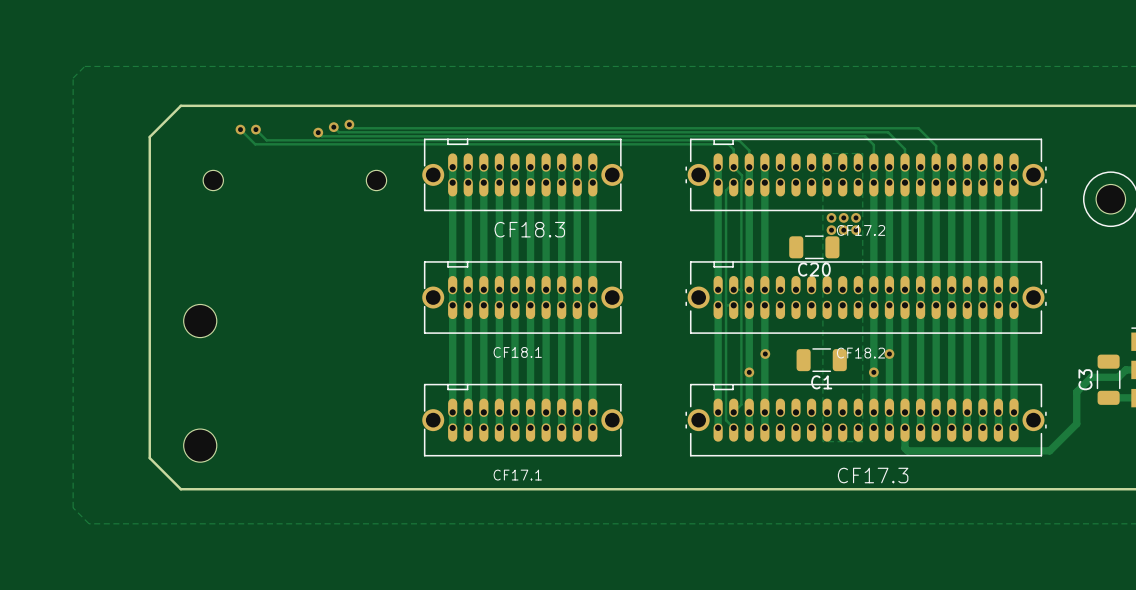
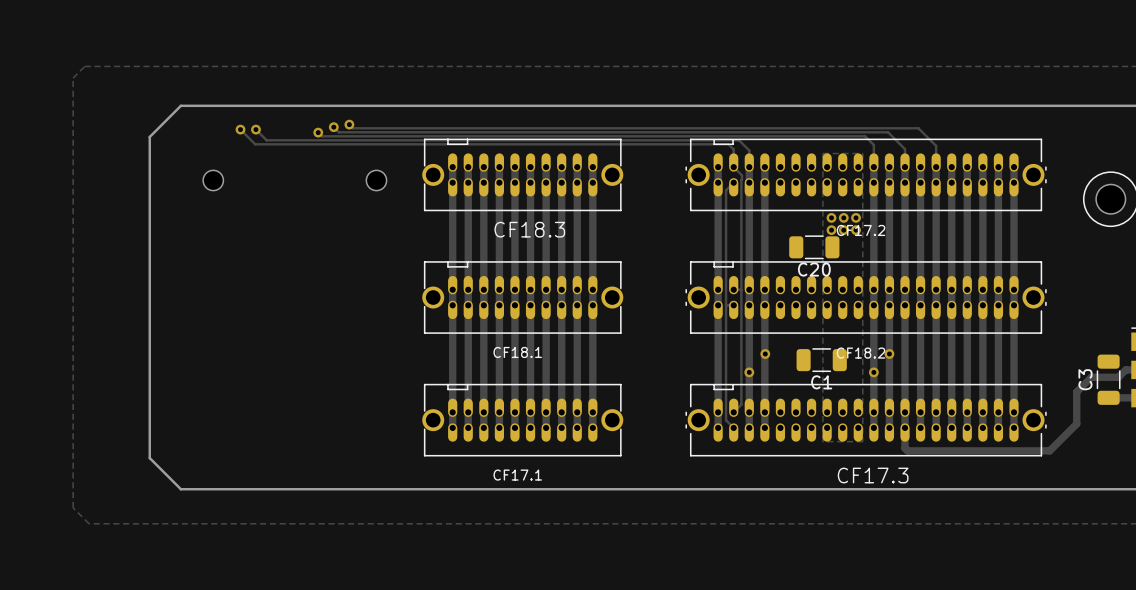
part: (200, 321) -> none
part: (200, 445) -> none

